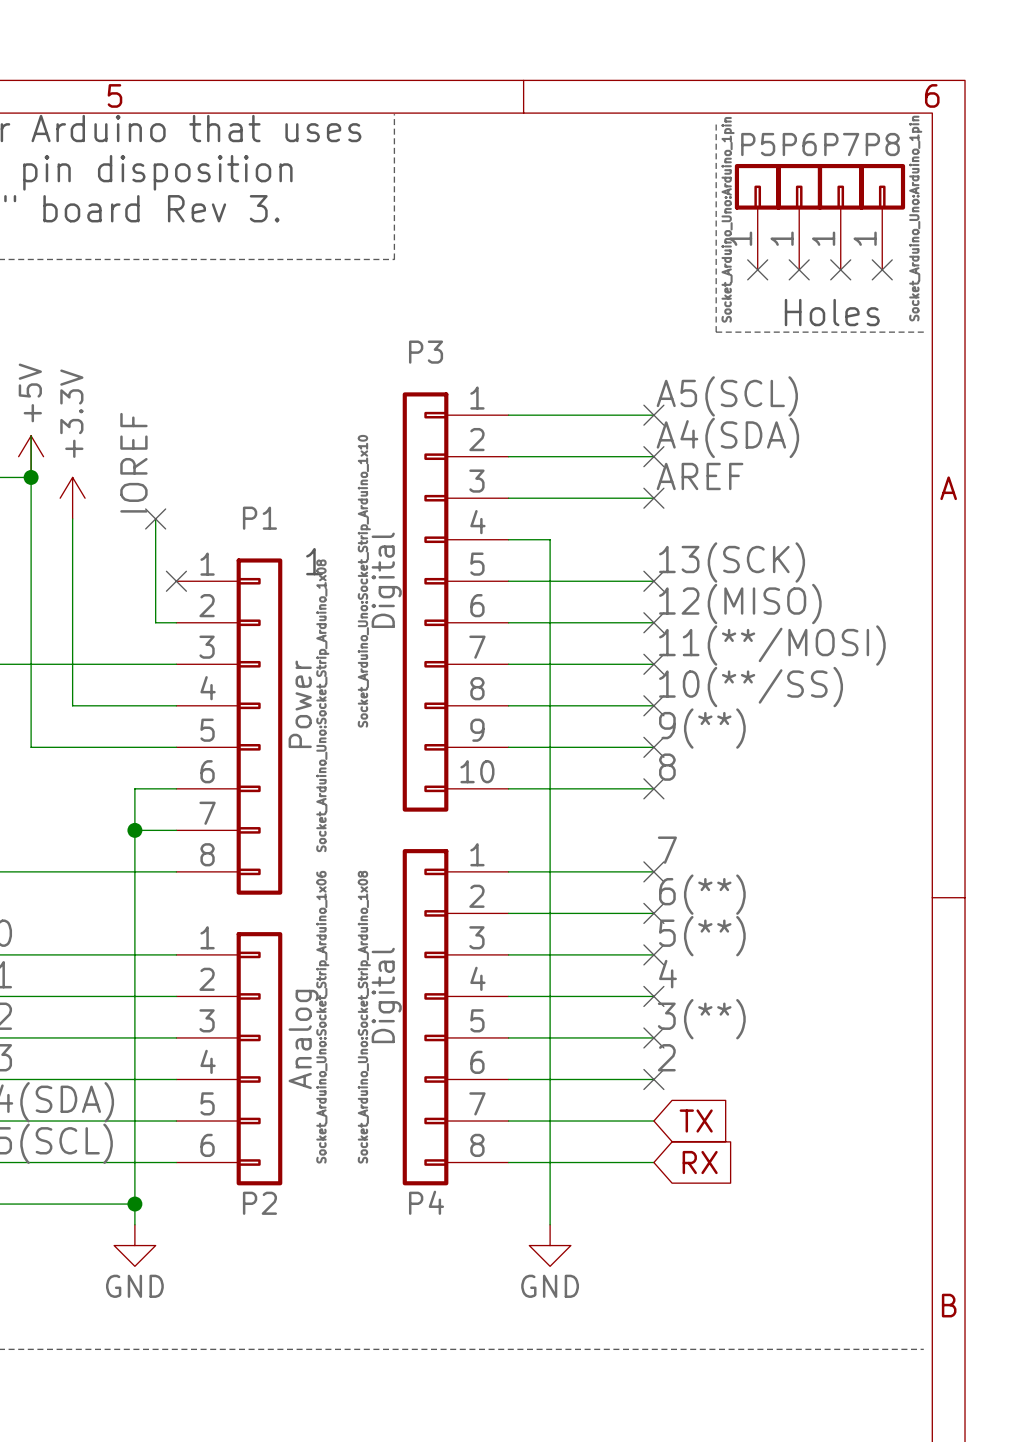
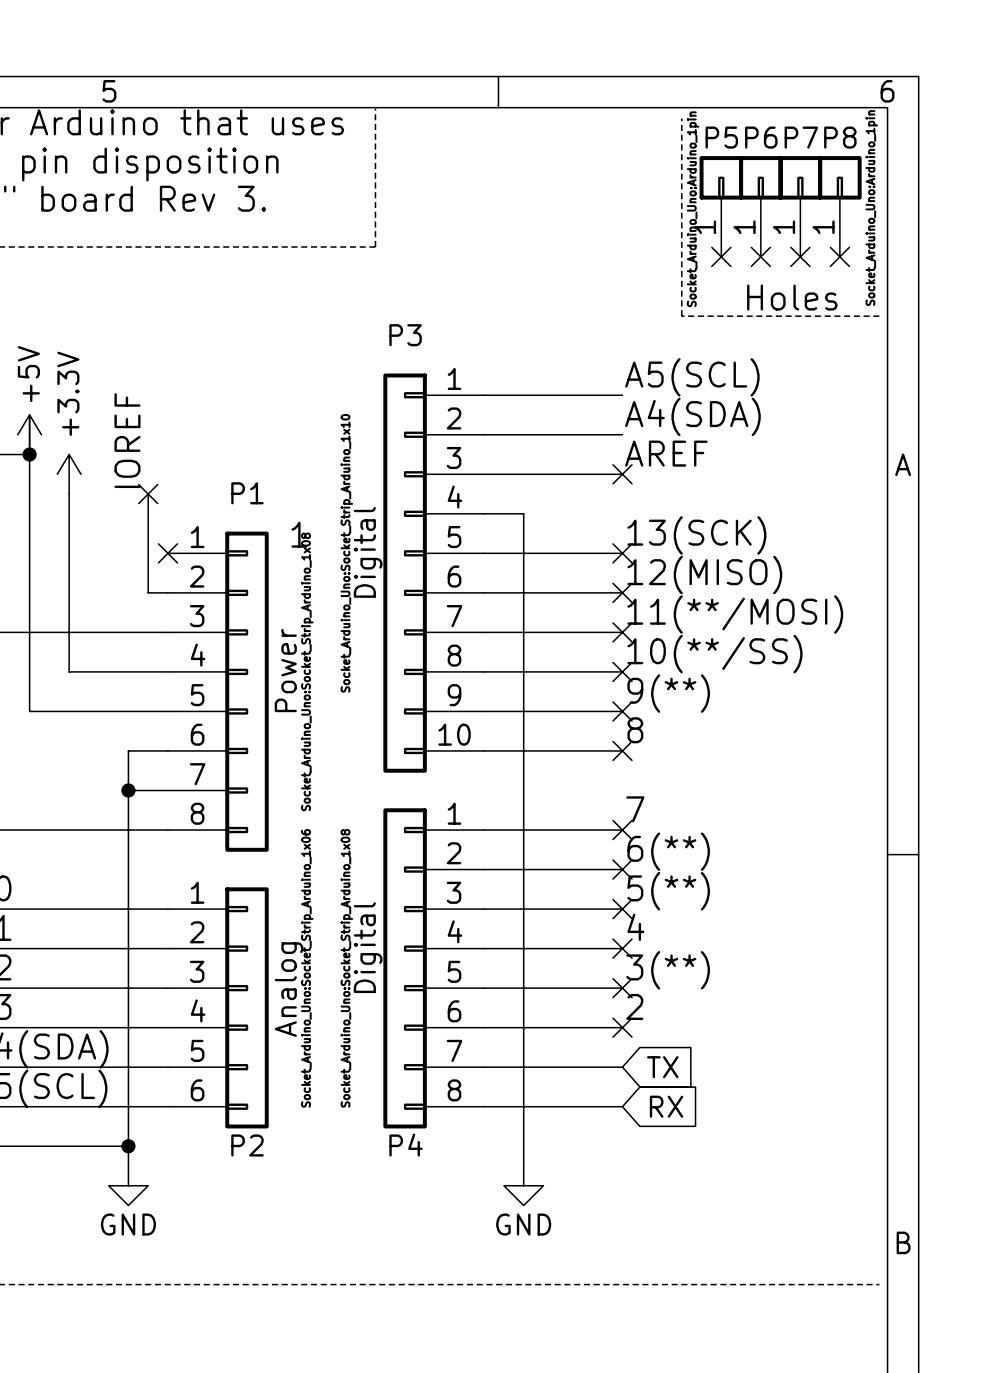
no-connect mark: (653, 415) -> none
no-connect mark: (653, 456) -> none

